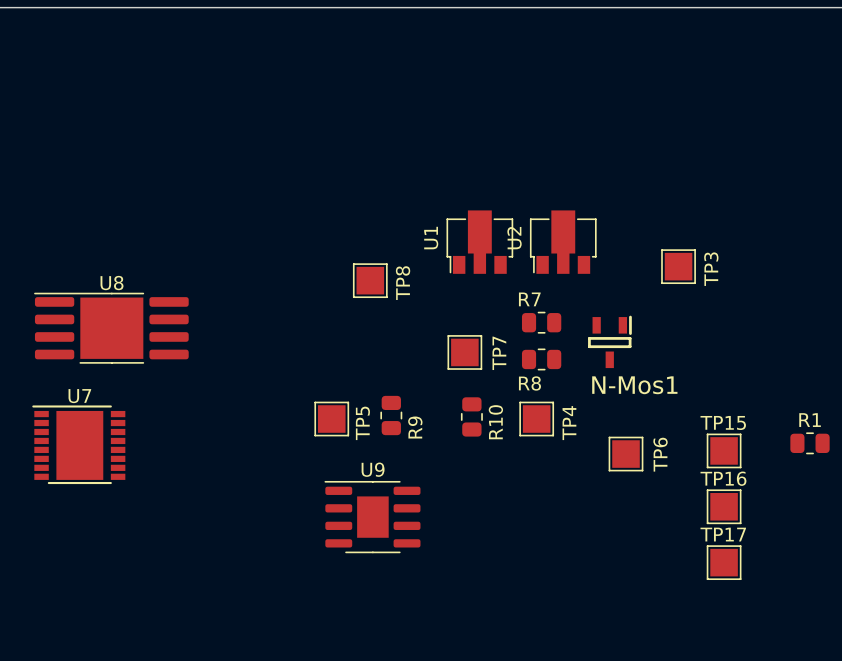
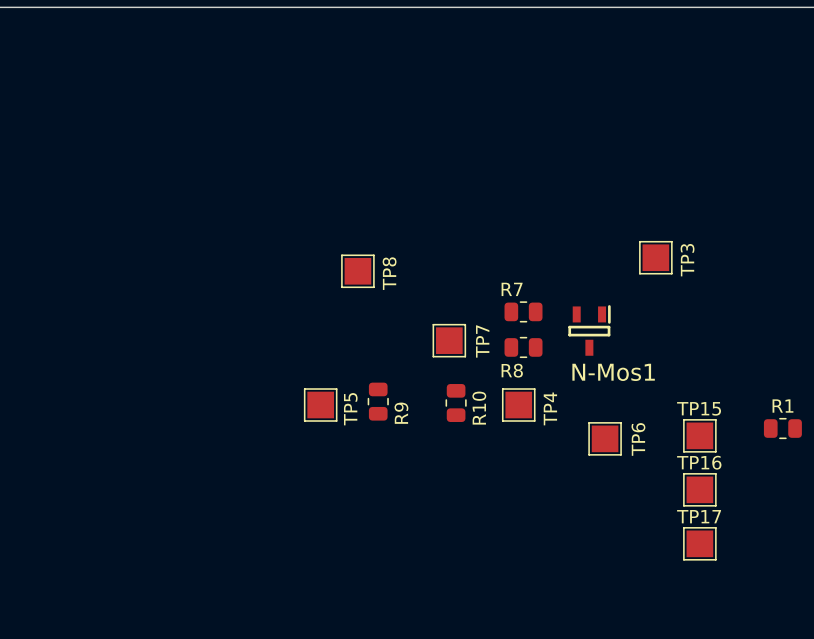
U1: (479, 242) -> none
U2: (563, 242) -> none
U8: (111, 328) -> none
U7: (78, 444) -> none
U9: (372, 517) -> none

